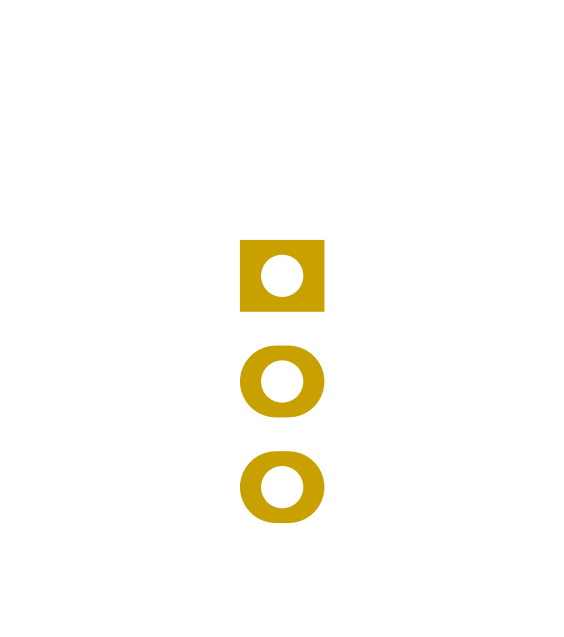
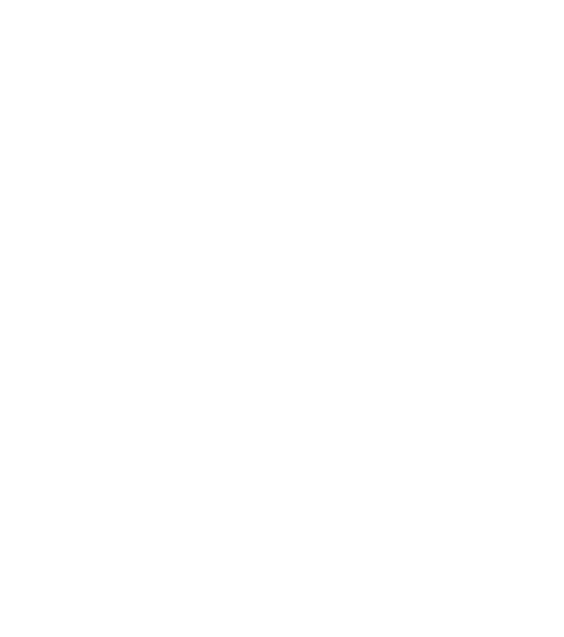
part: (282, 381) -> none

